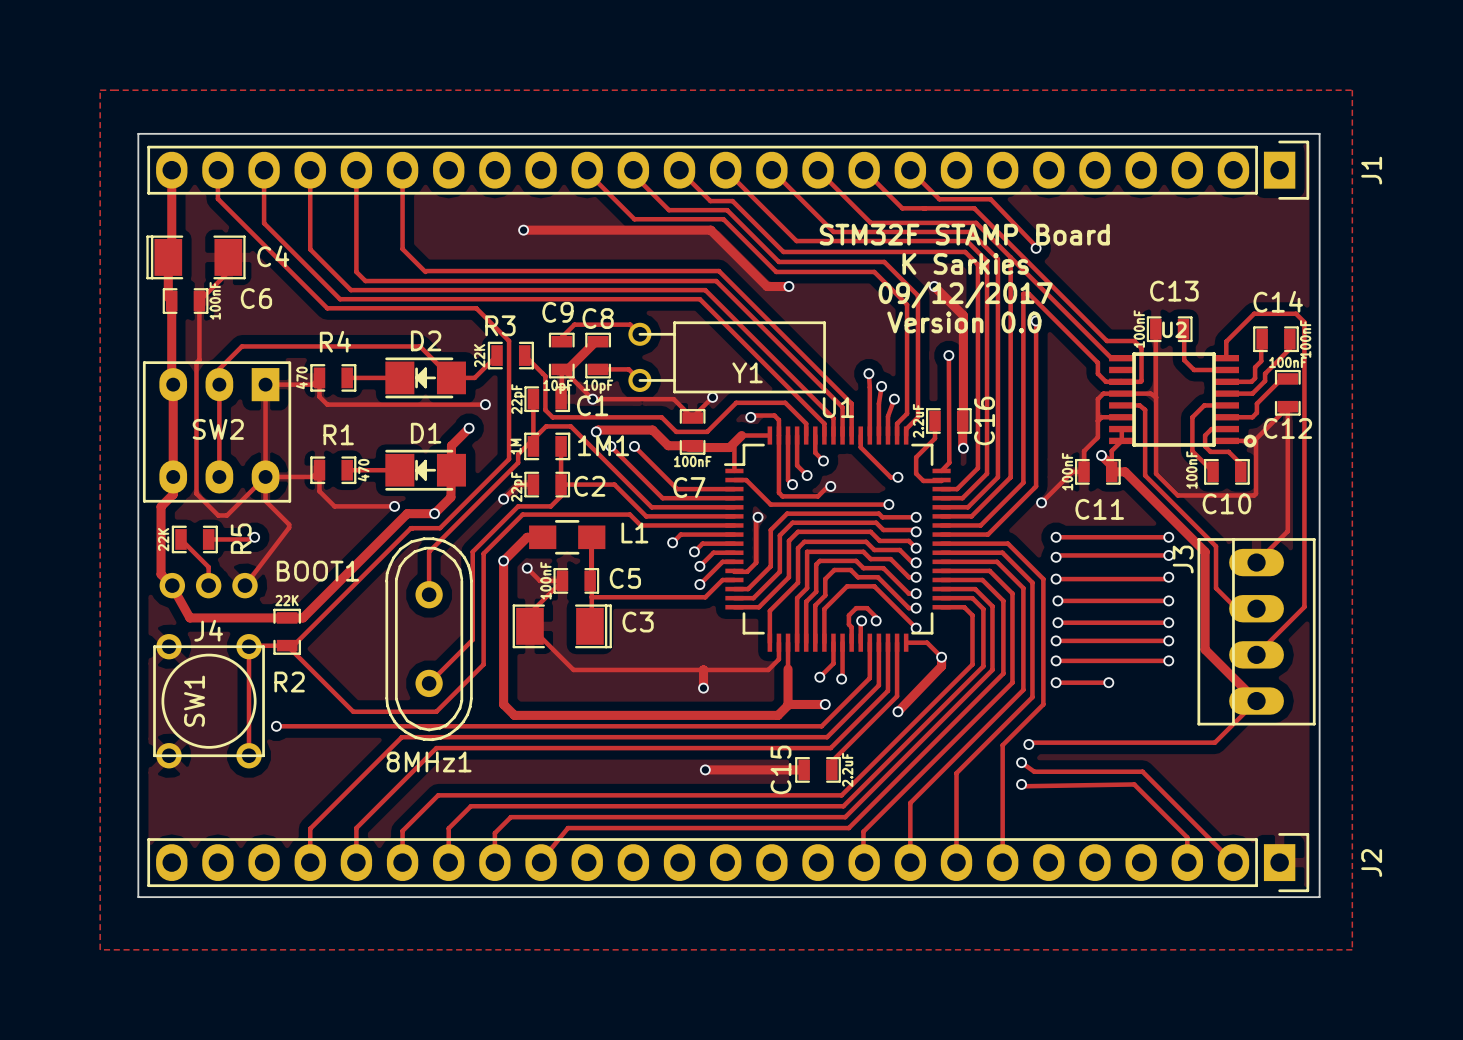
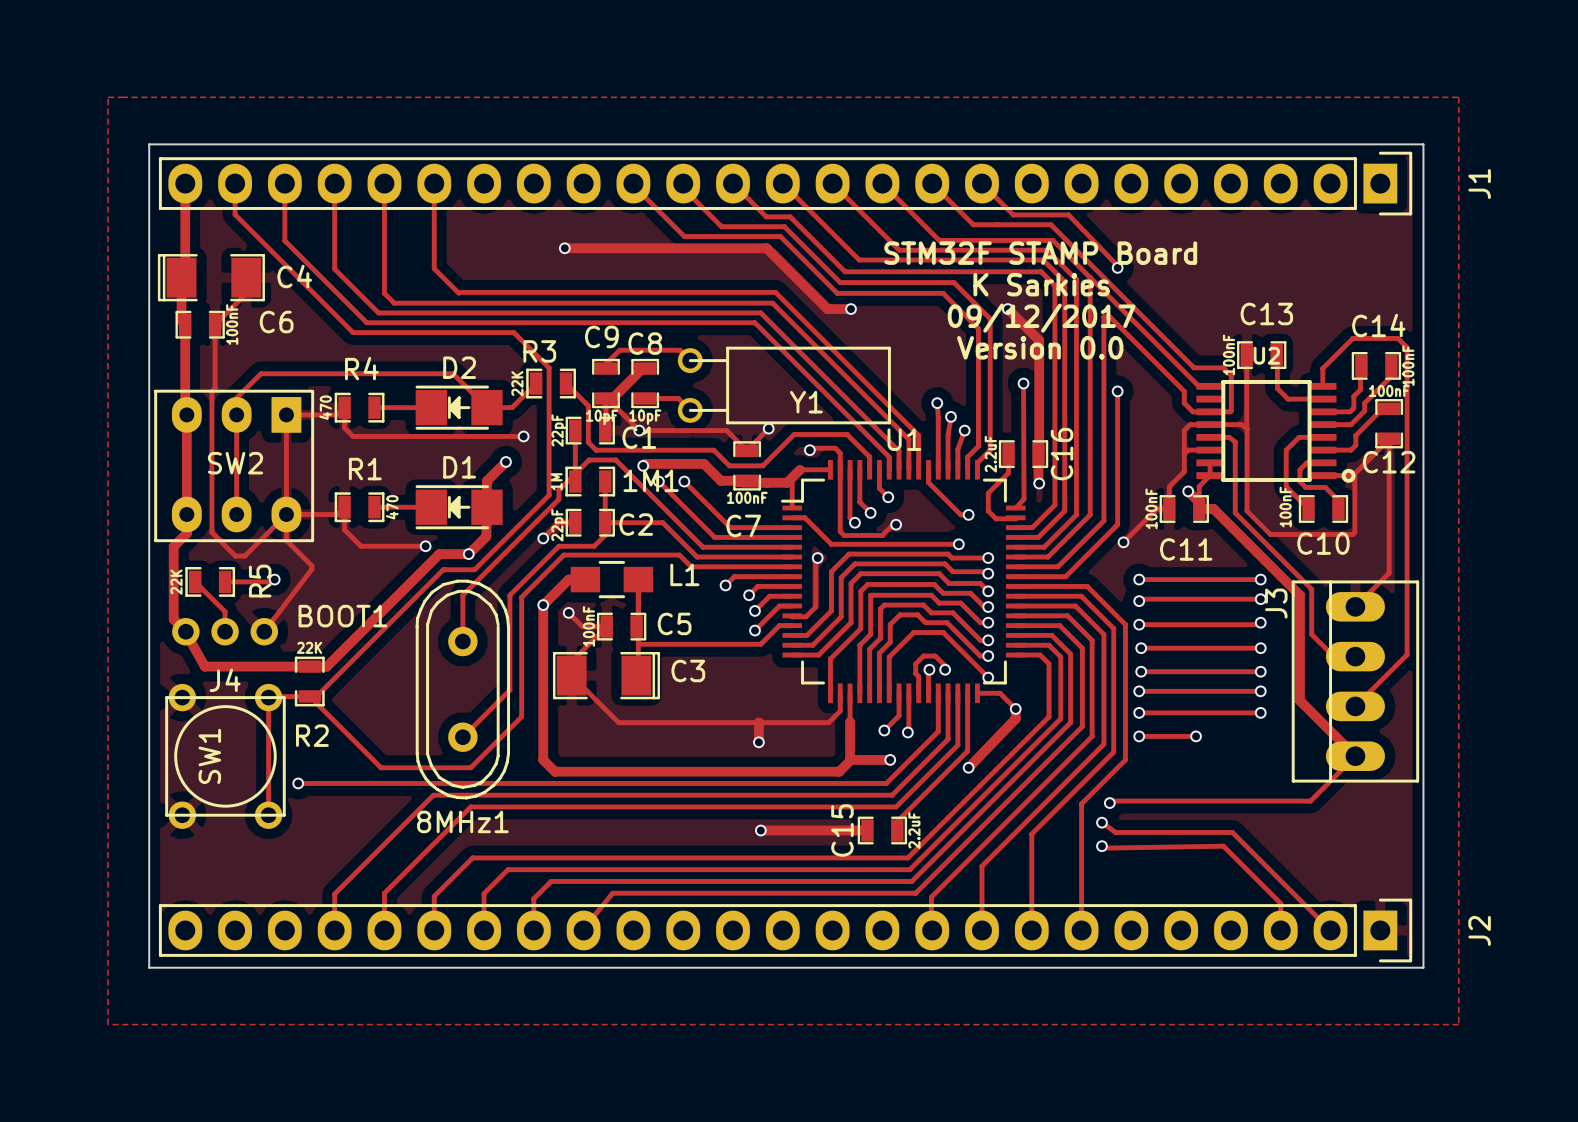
track: (1036, 321) (1036, 362) -> none
via position: (1036, 321) -> (1117, 391)

